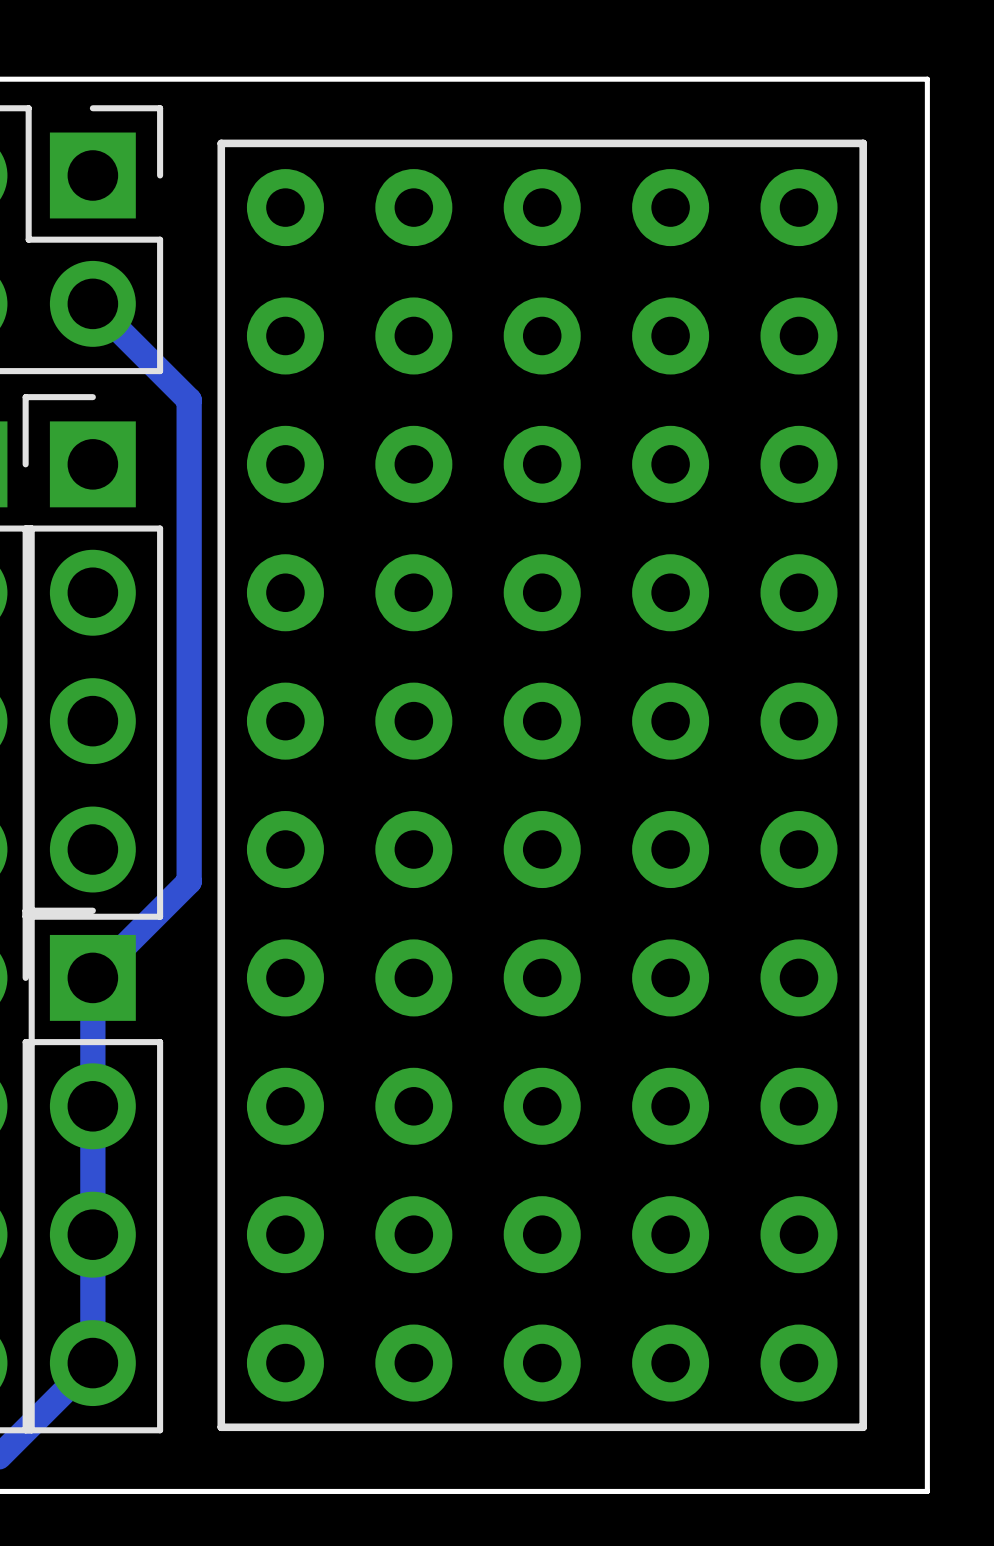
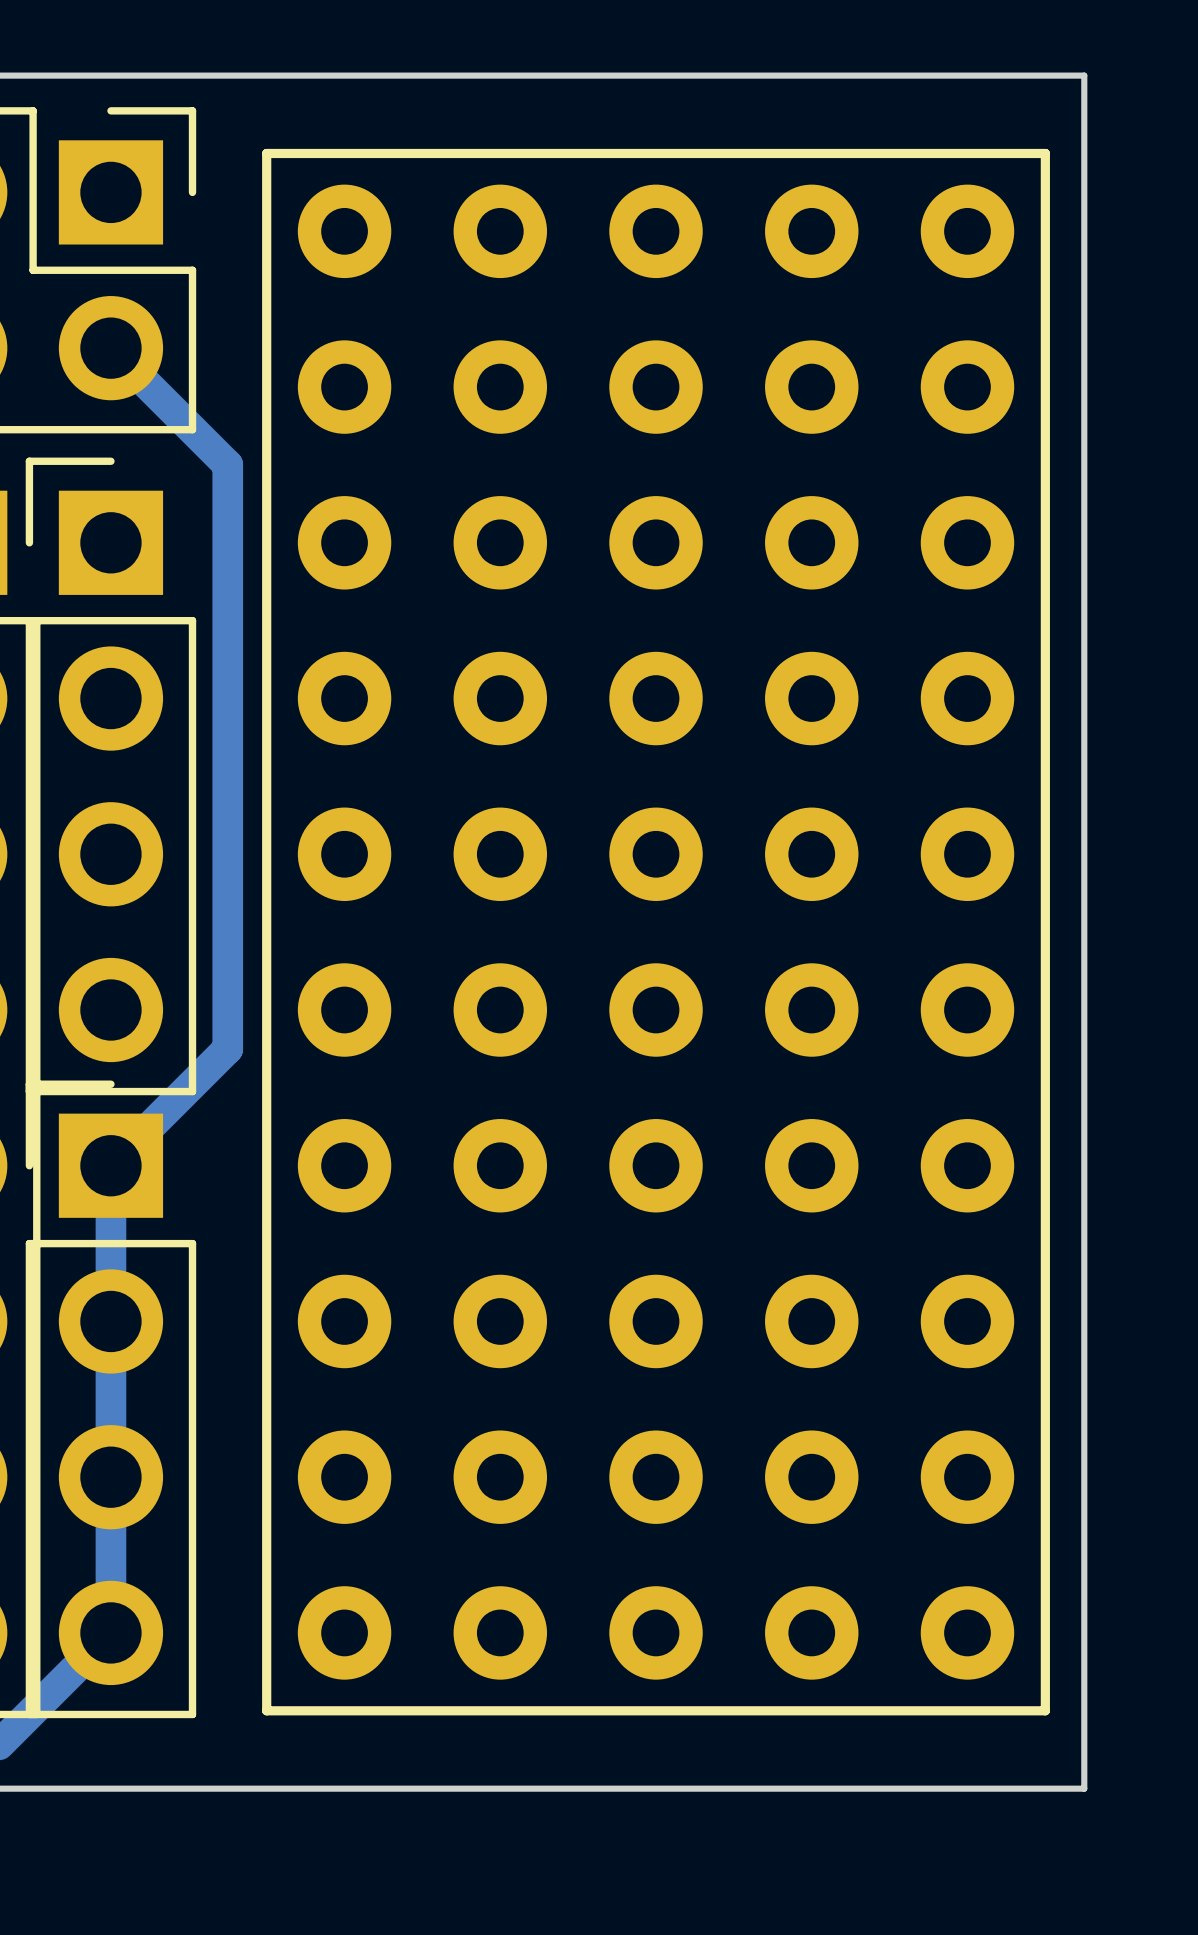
board edge: (895, 79) (927, 79) (927, 1491) (895, 1491) -> (1084, 75) (1084, 1788)

